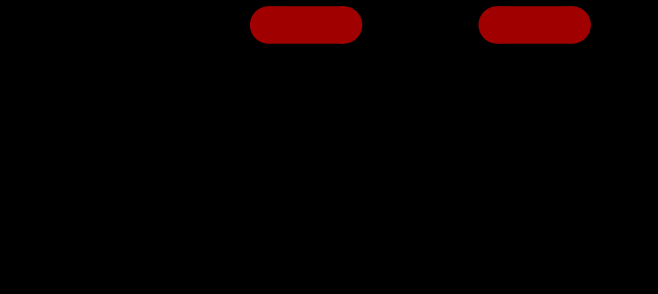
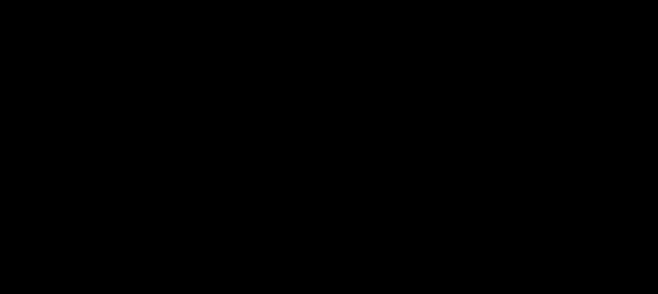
part: (306, 24) -> none
part: (534, 24) -> none

